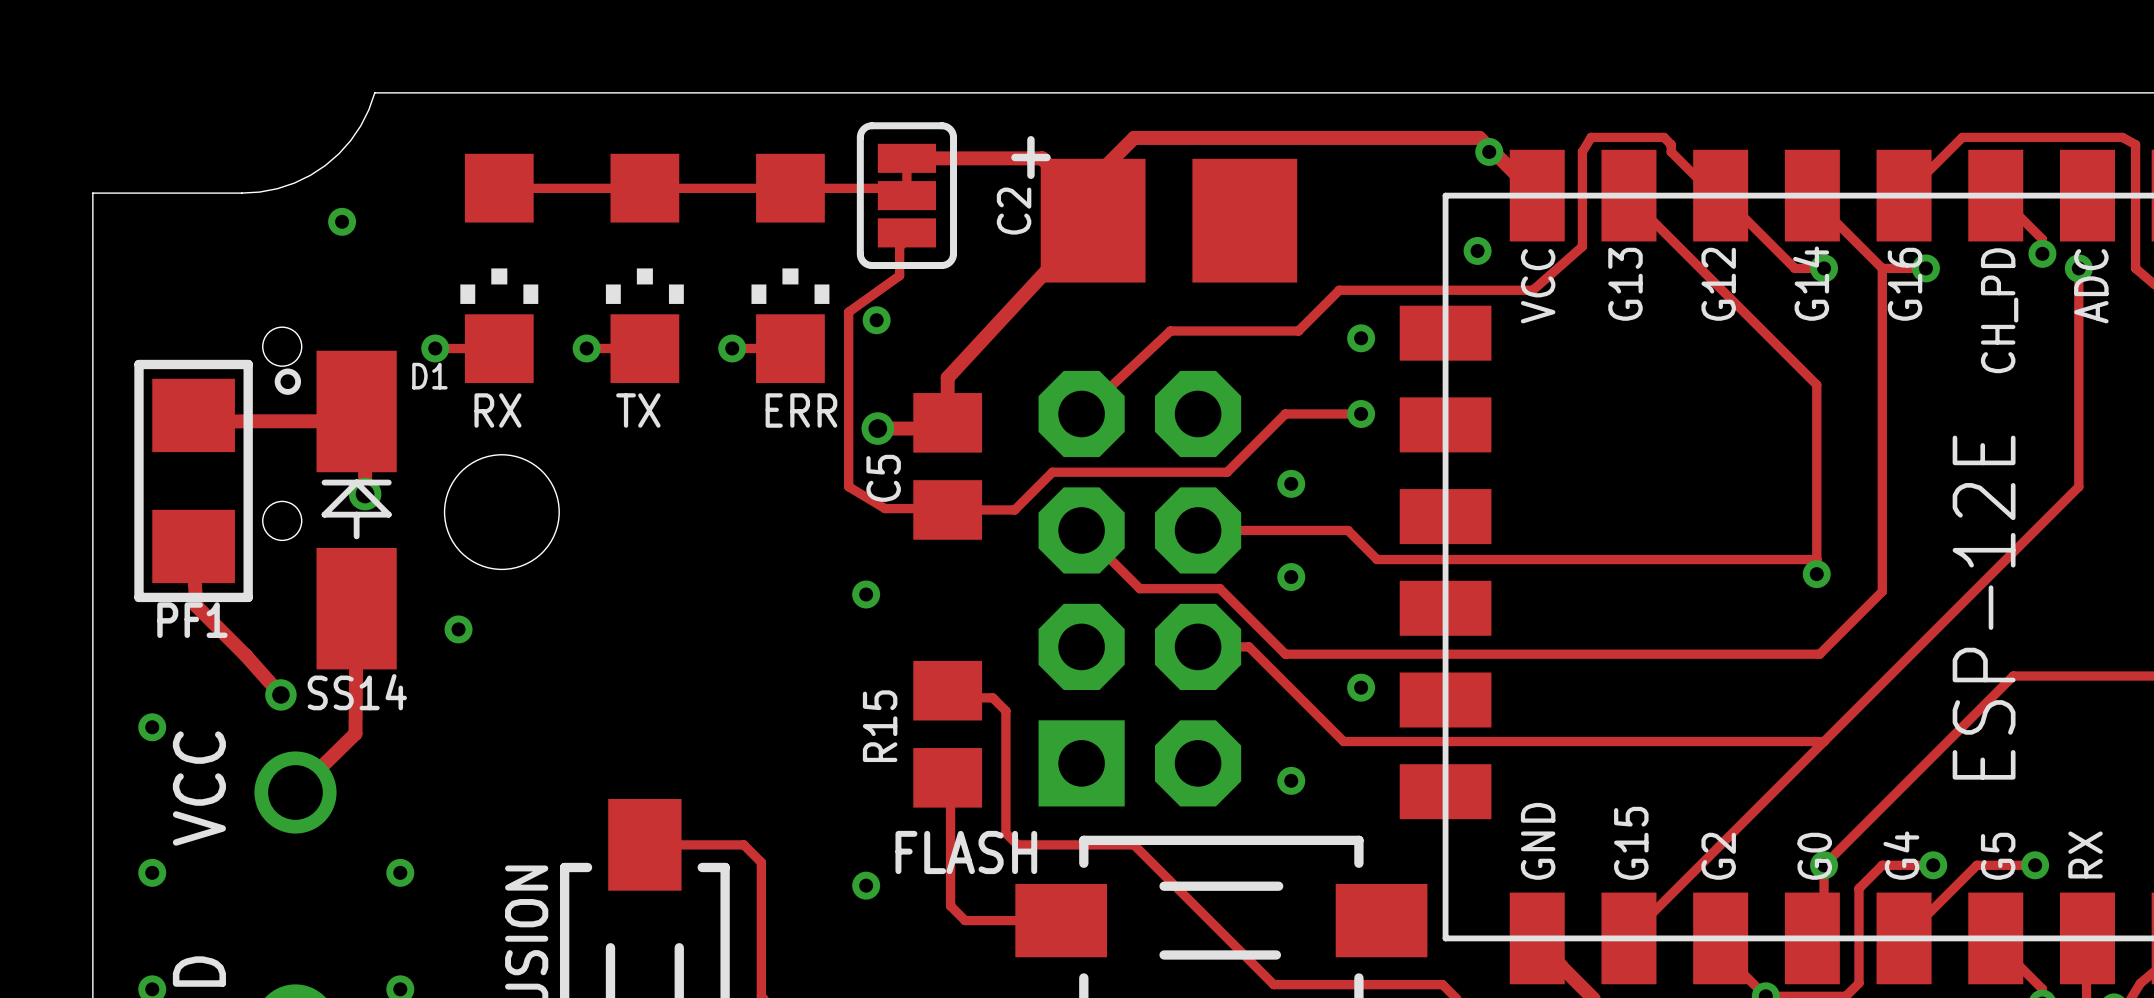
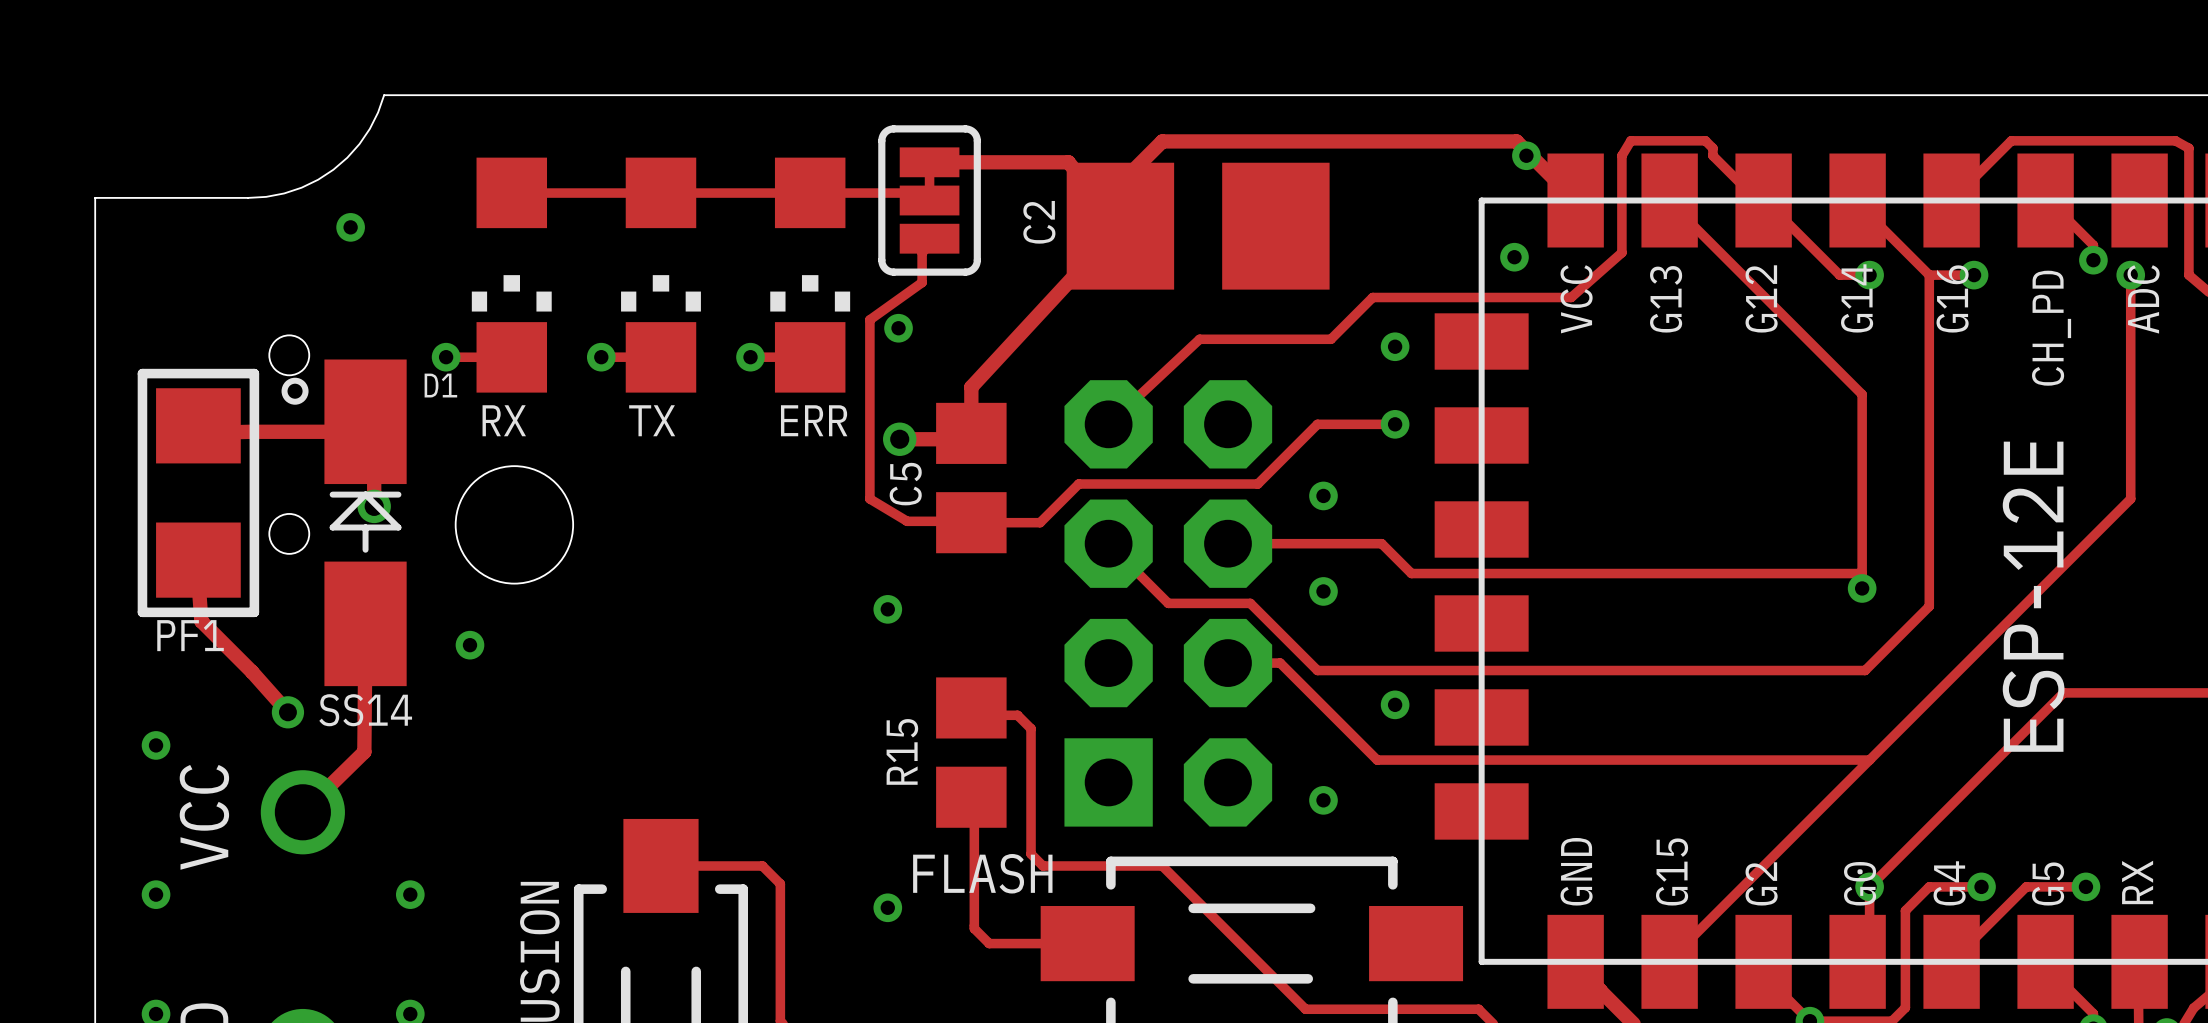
text: + (1030, 157) -> none

